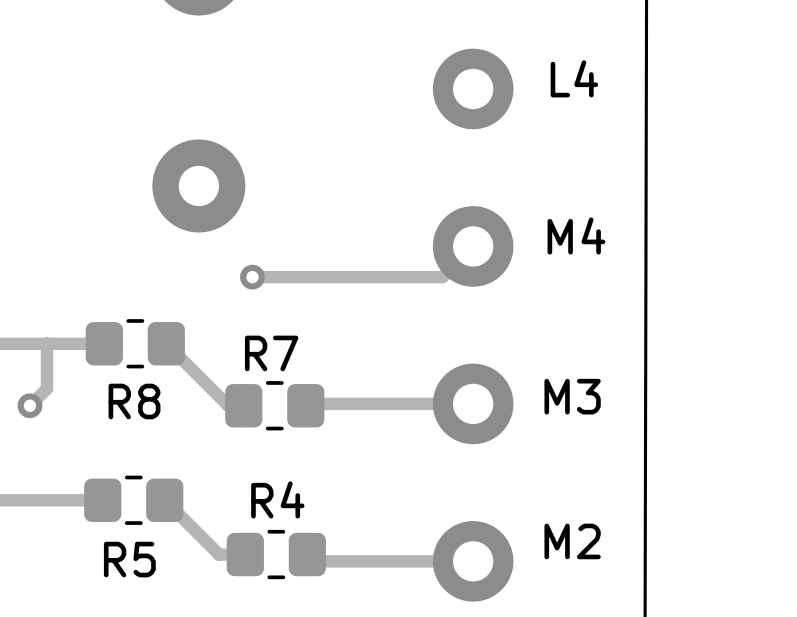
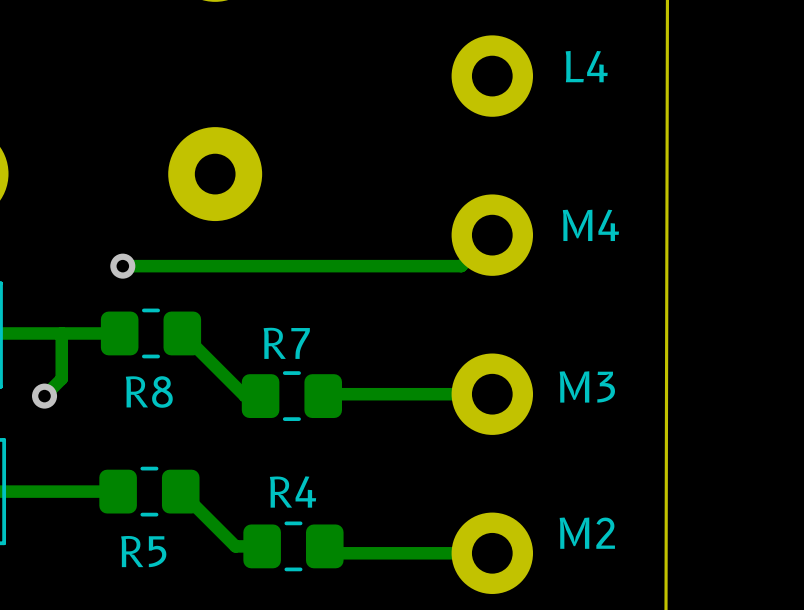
track: none -> (269, 266) (122, 266)
via position: (252, 277) -> (122, 266)

